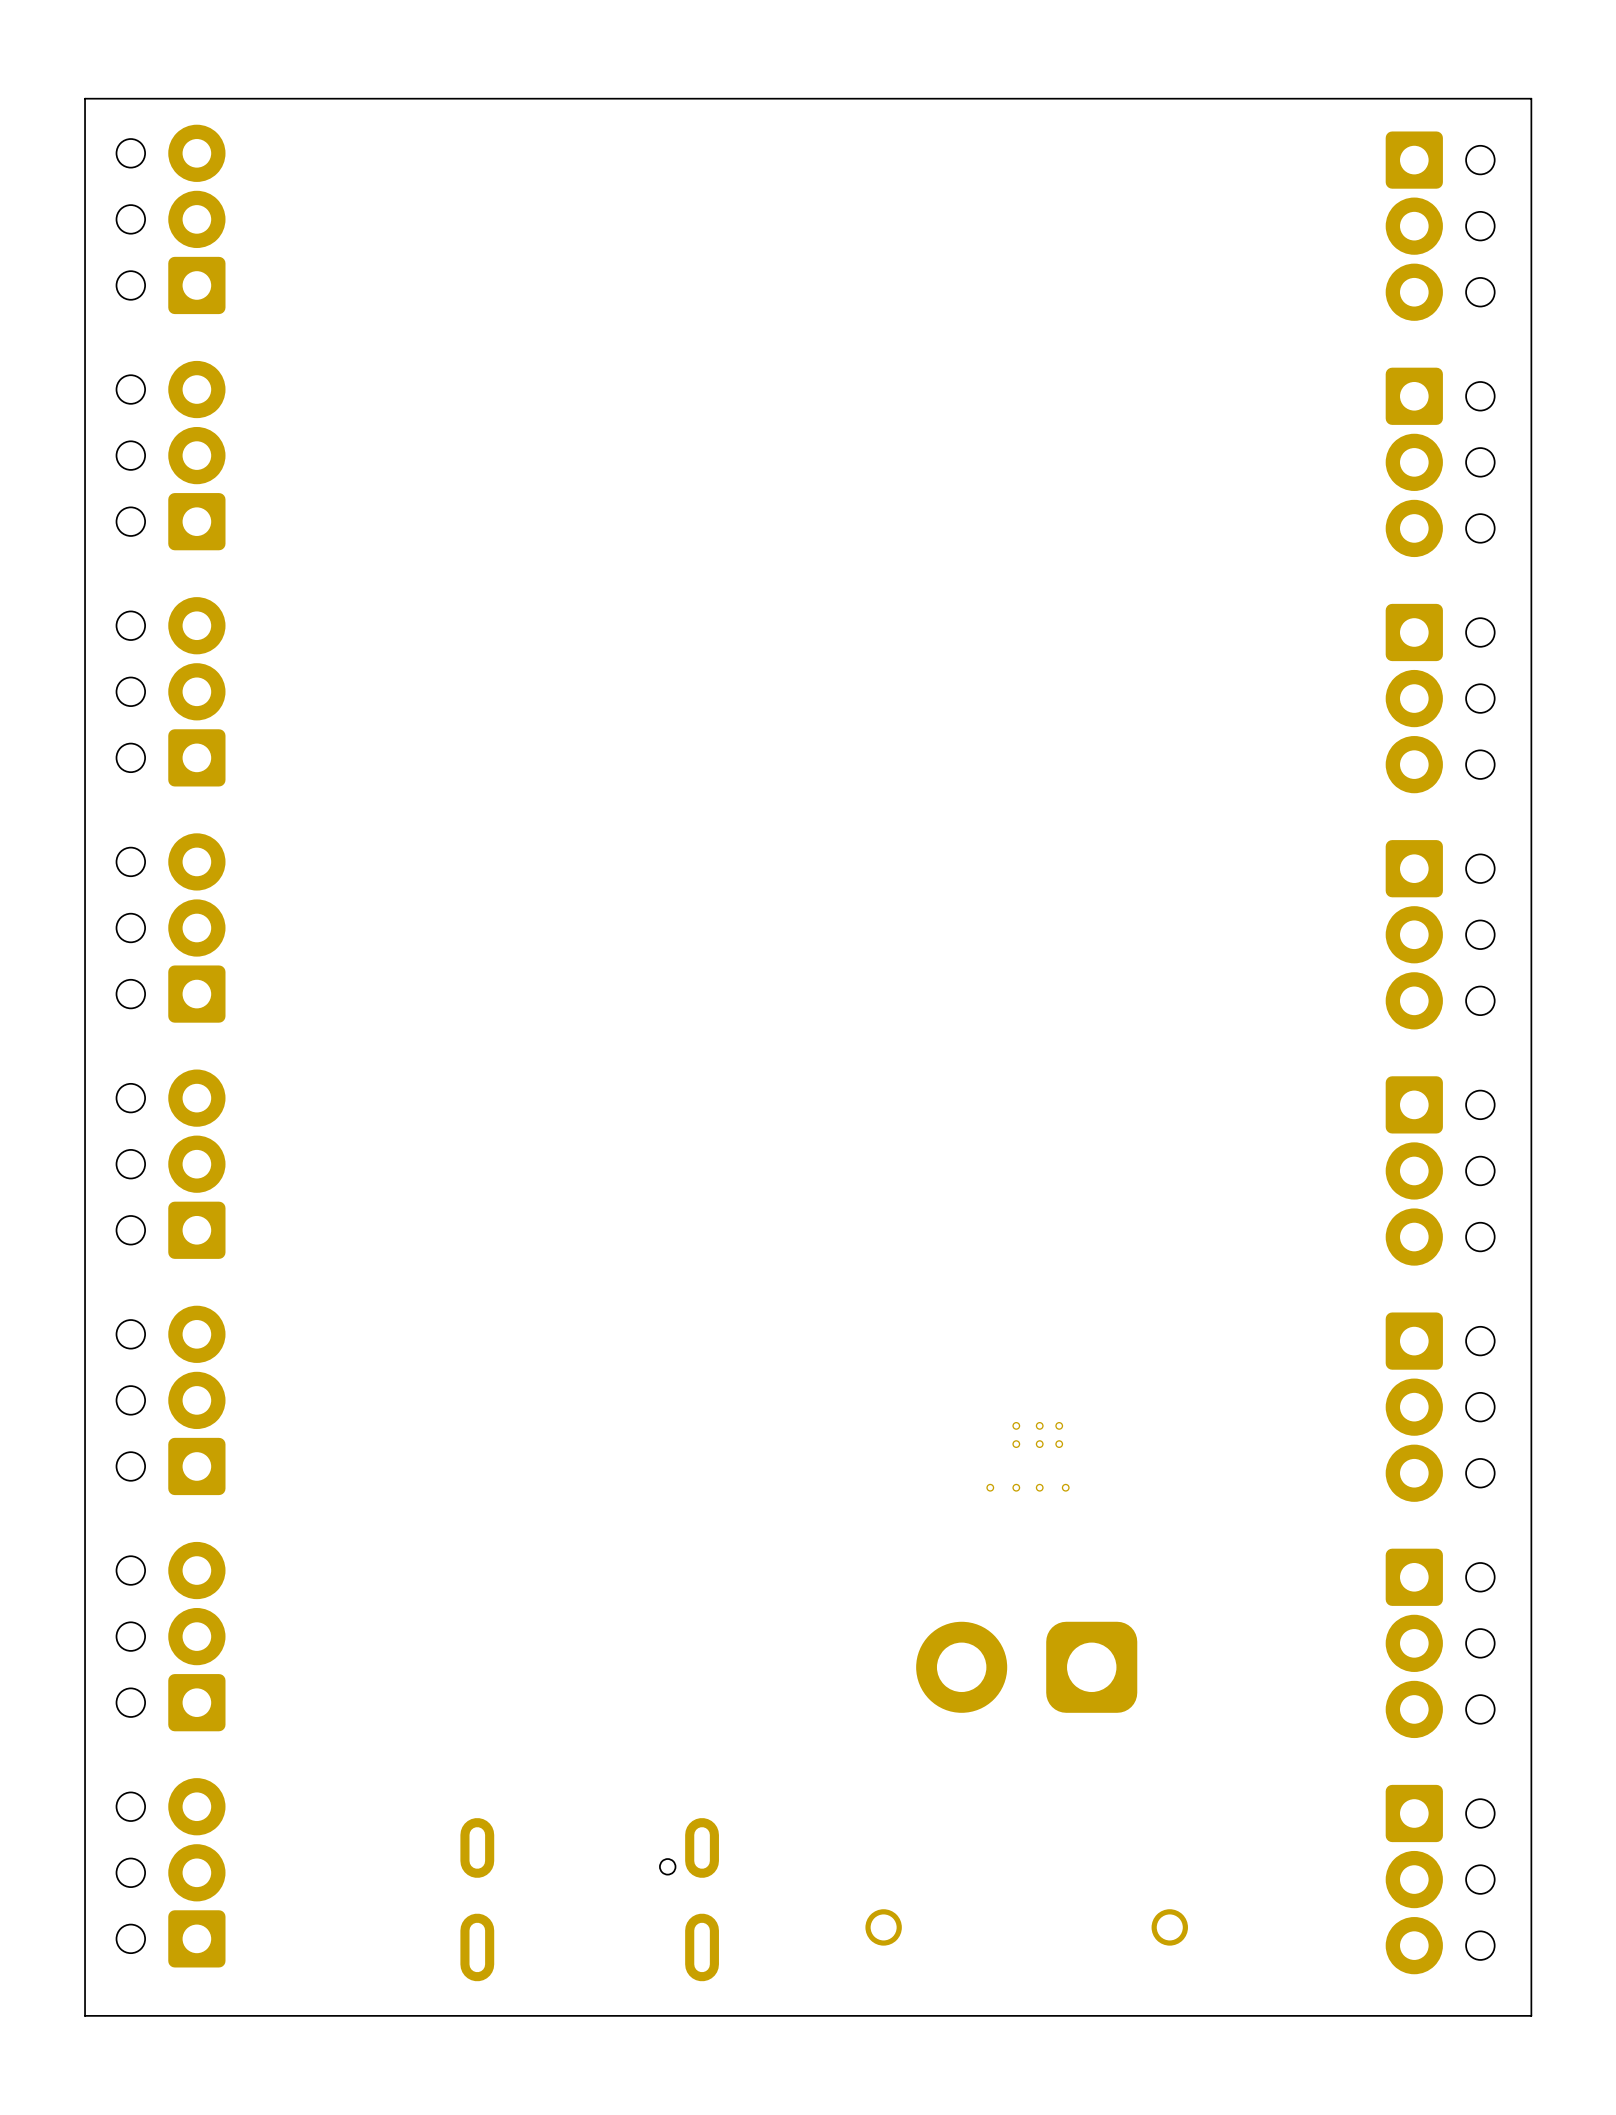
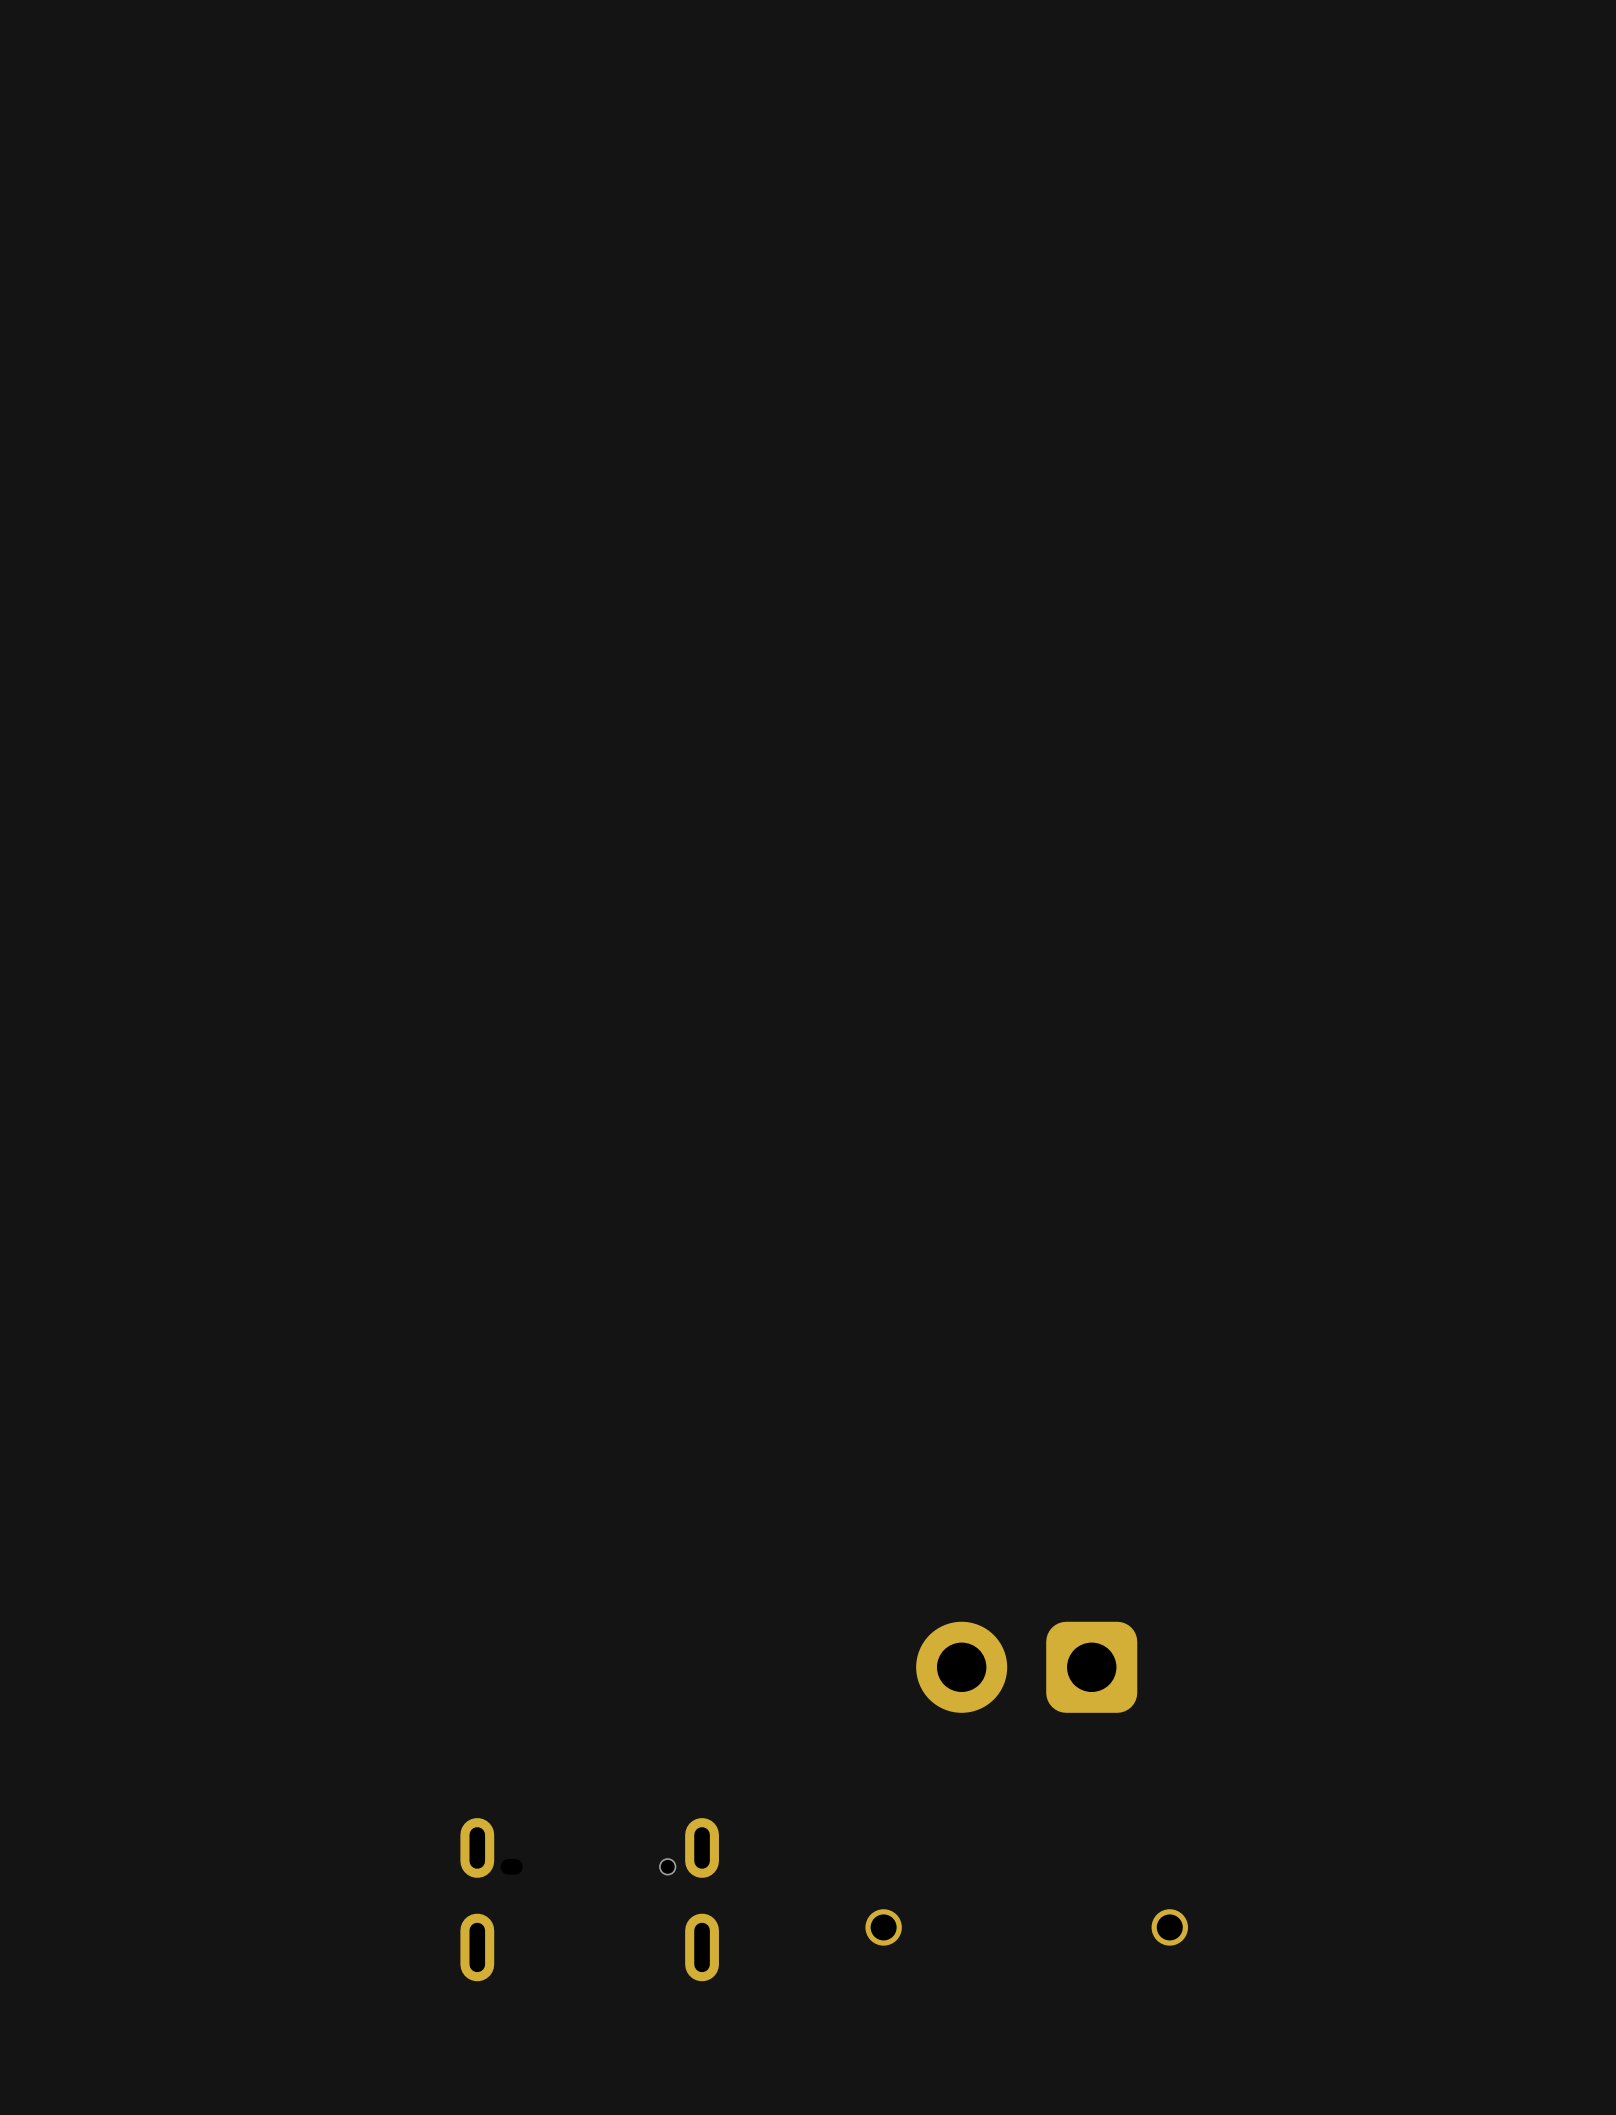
board edge: (1531, 98) (85, 98) (85, 2015) (1531, 2015) (1531, 98) -> none
part: (170, 219) -> none
part: (1440, 226) -> none
part: (170, 455) -> none
part: (1440, 462) -> none
part: (170, 691) -> none
part: (1440, 698) -> none
part: (170, 928) -> none
part: (1440, 934) -> none
part: (170, 1164) -> none
part: (1440, 1170) -> none
part: (170, 1400) -> none
part: (1440, 1407) -> none
part: (1028, 1456) -> none
part: (170, 1636) -> none
part: (1440, 1643) -> none
part: (170, 1872) -> none
part: (1440, 1879) -> none

